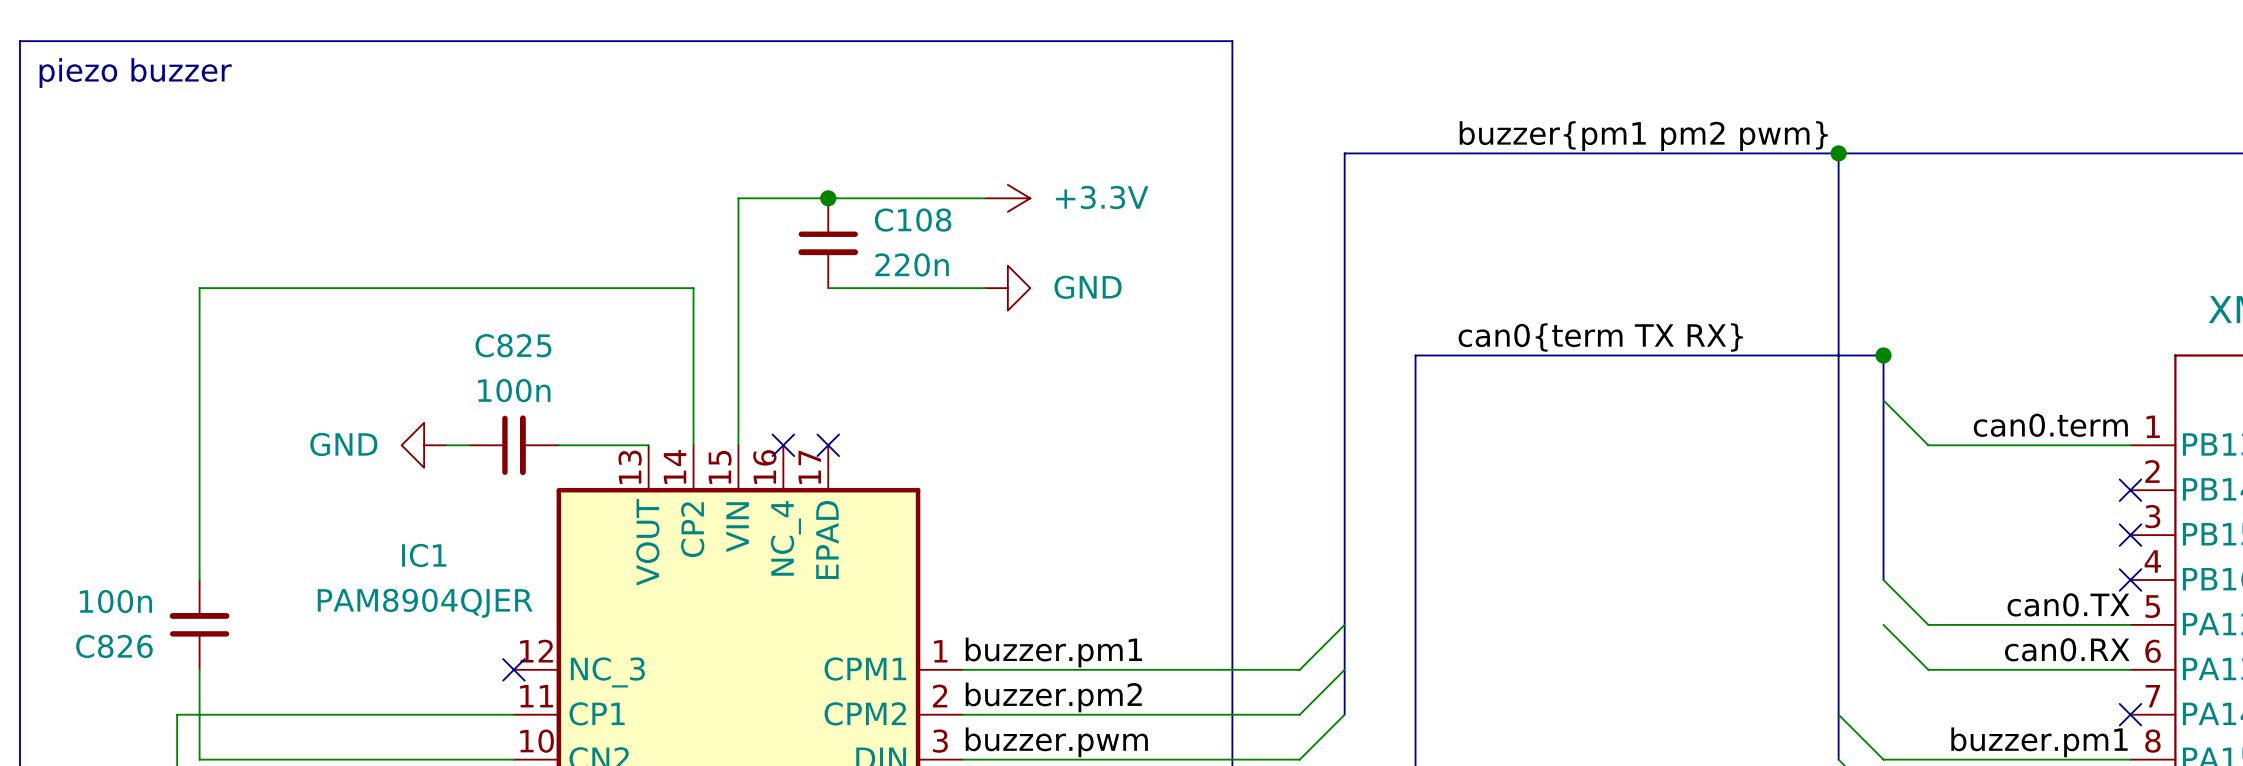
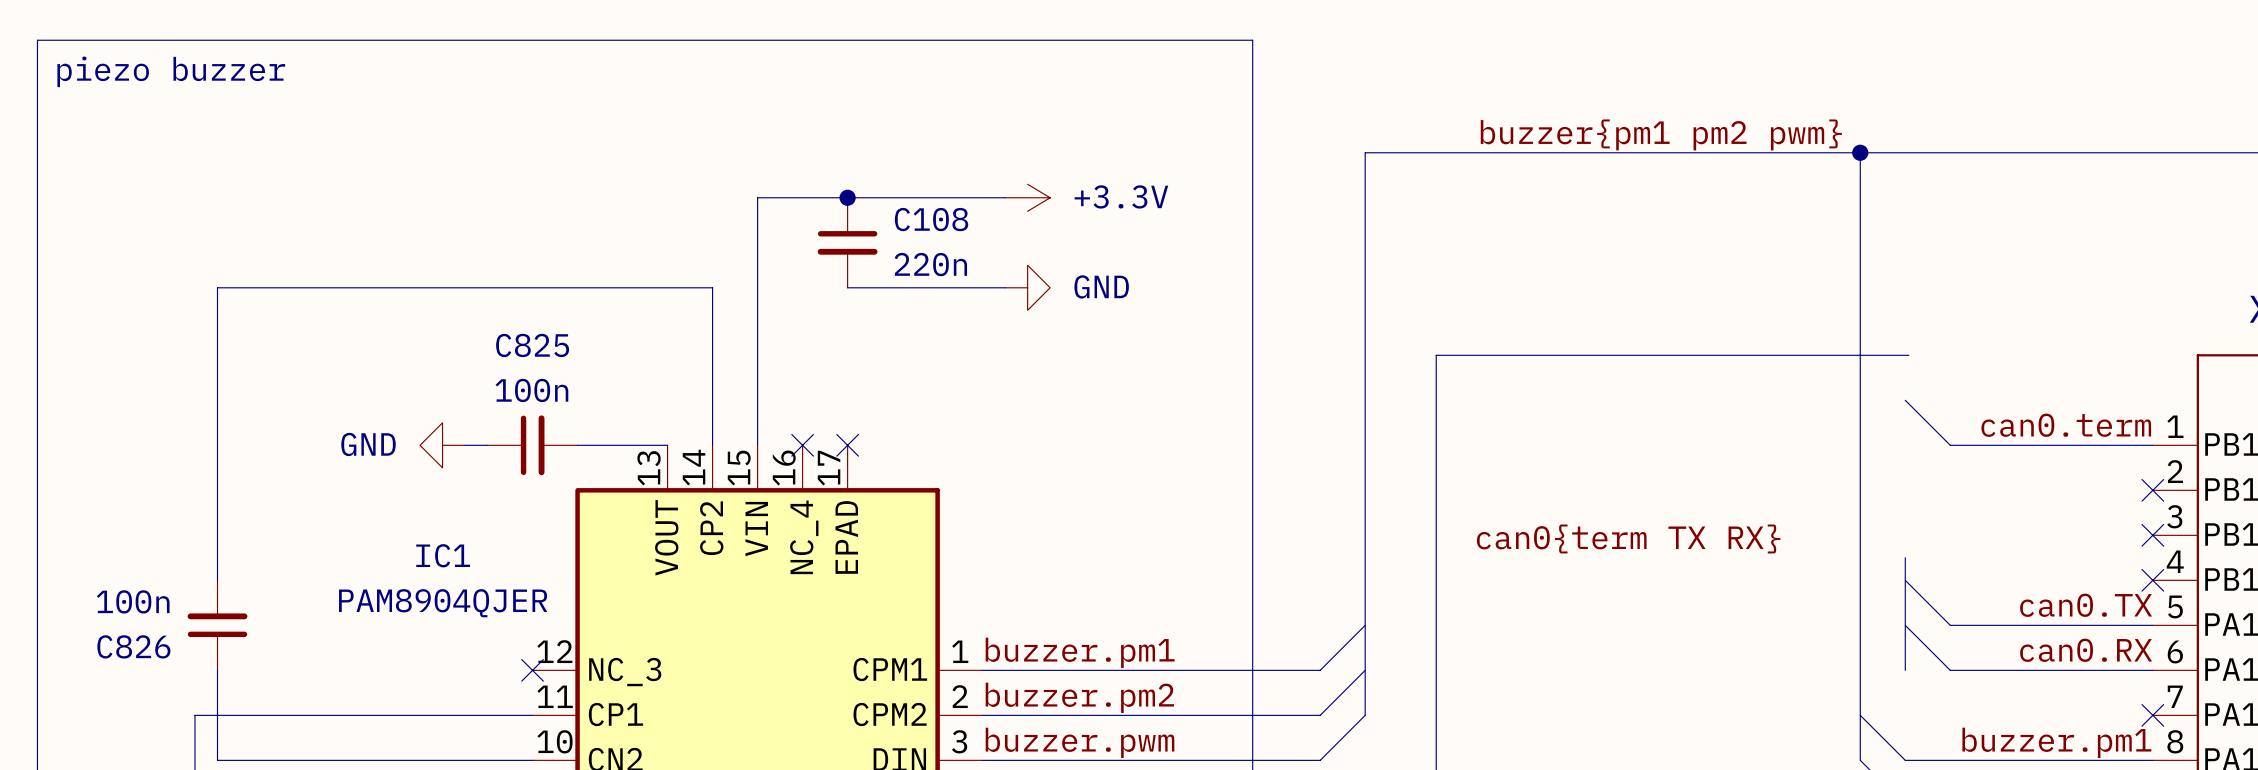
label position: can0{term TX RX} (1600, 337) -> can0{term TX RX} (1628, 538)
bus: (1883, 355) (1883, 557) -> none
junction: (1883, 355) -> none
bus: none -> (1905, 580) (1905, 670)

